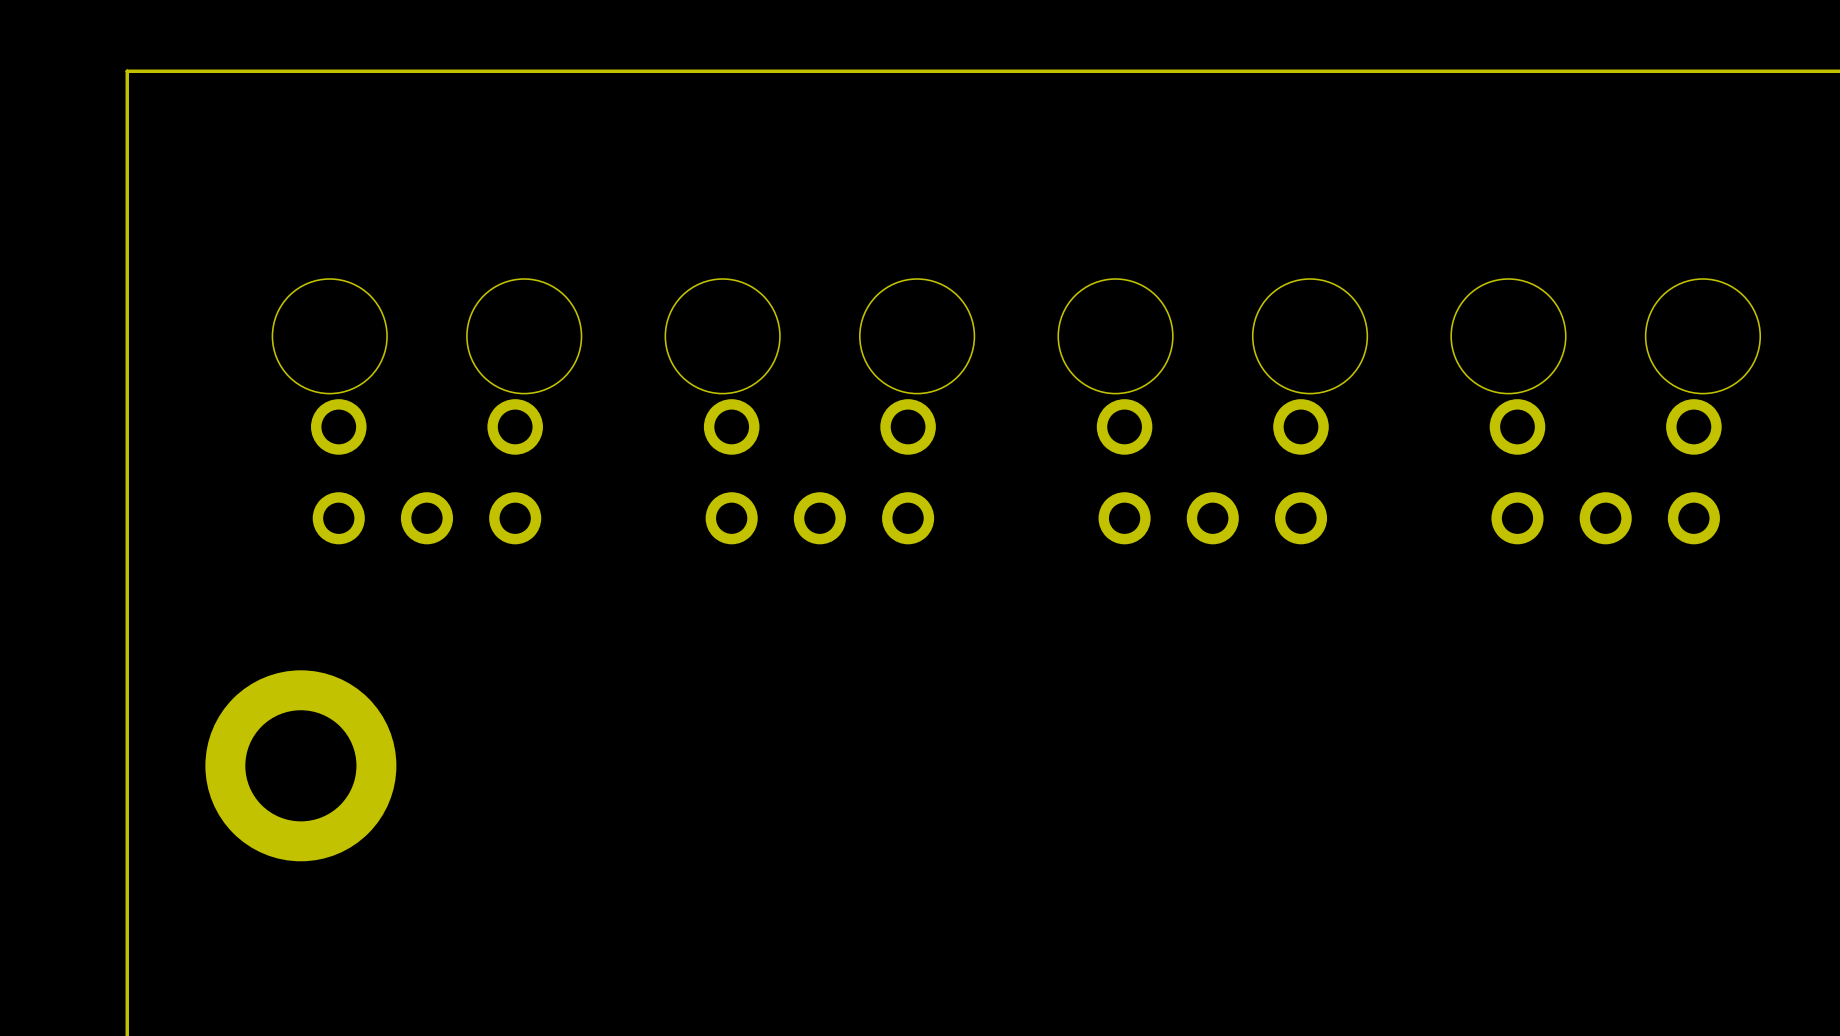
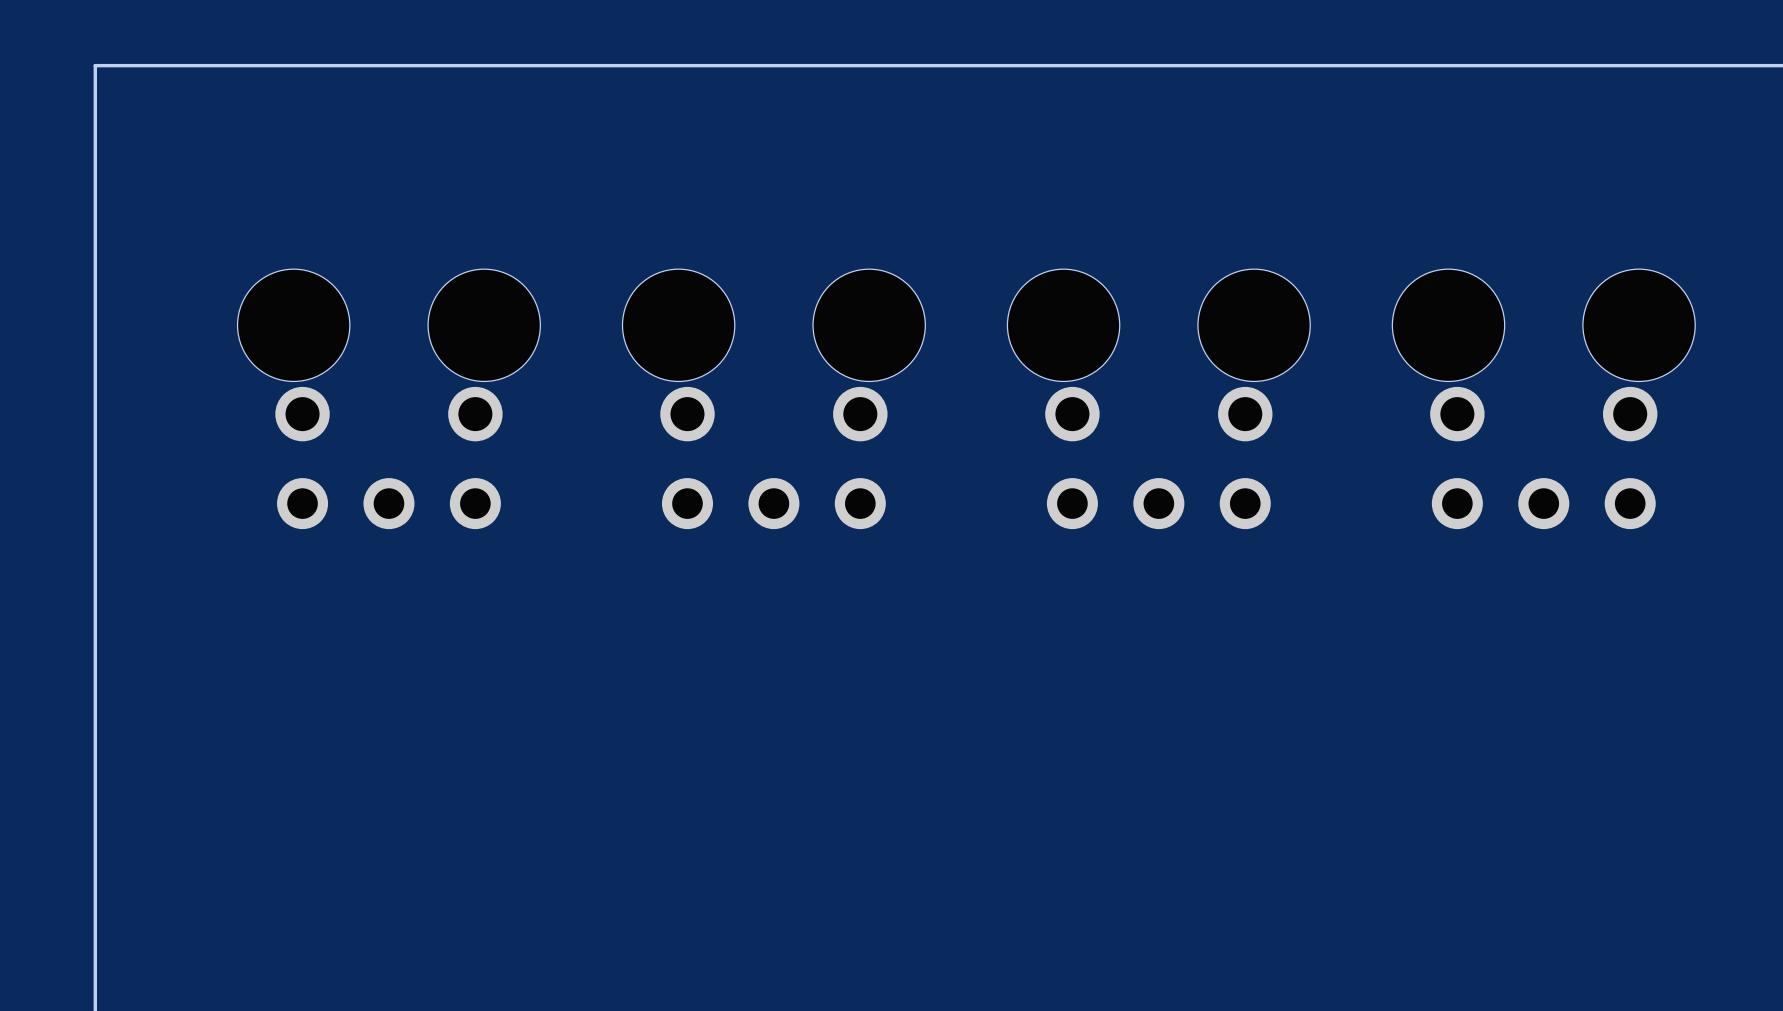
part: (300, 765) -> none

